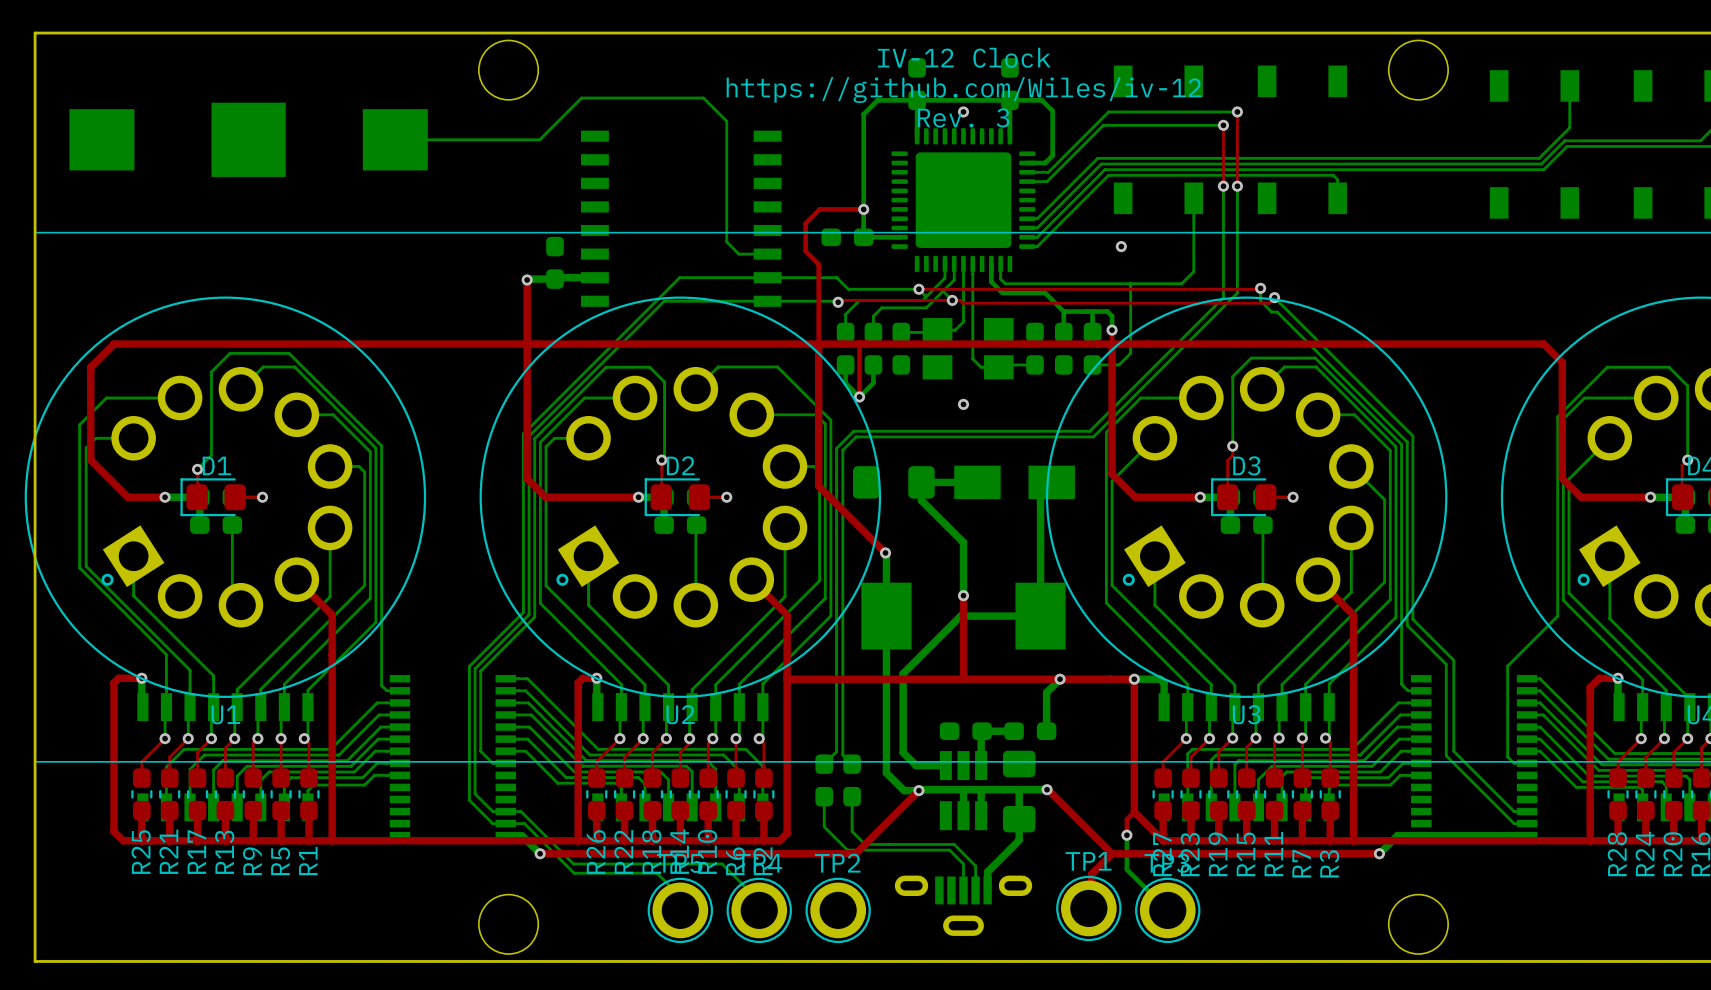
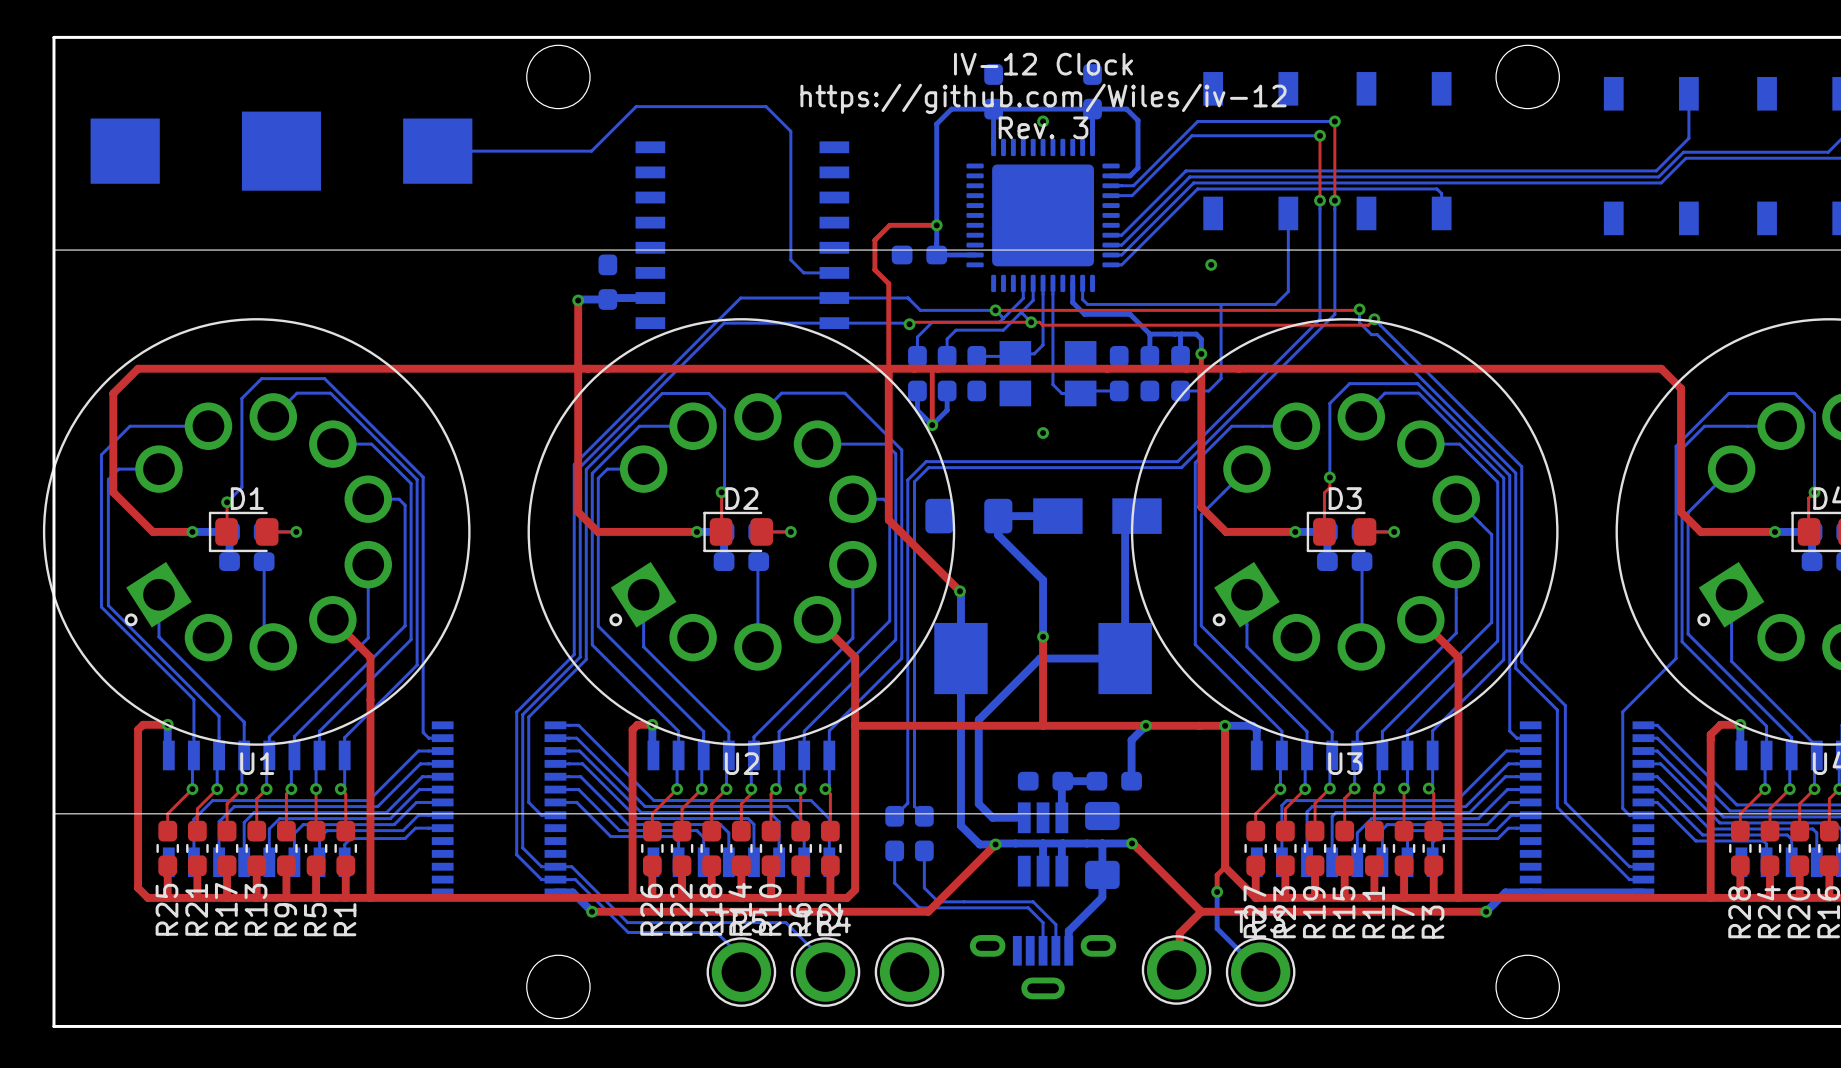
TP1 name: TP1 (1088, 861) -> none
TP2 name: TP2 (837, 863) -> none

